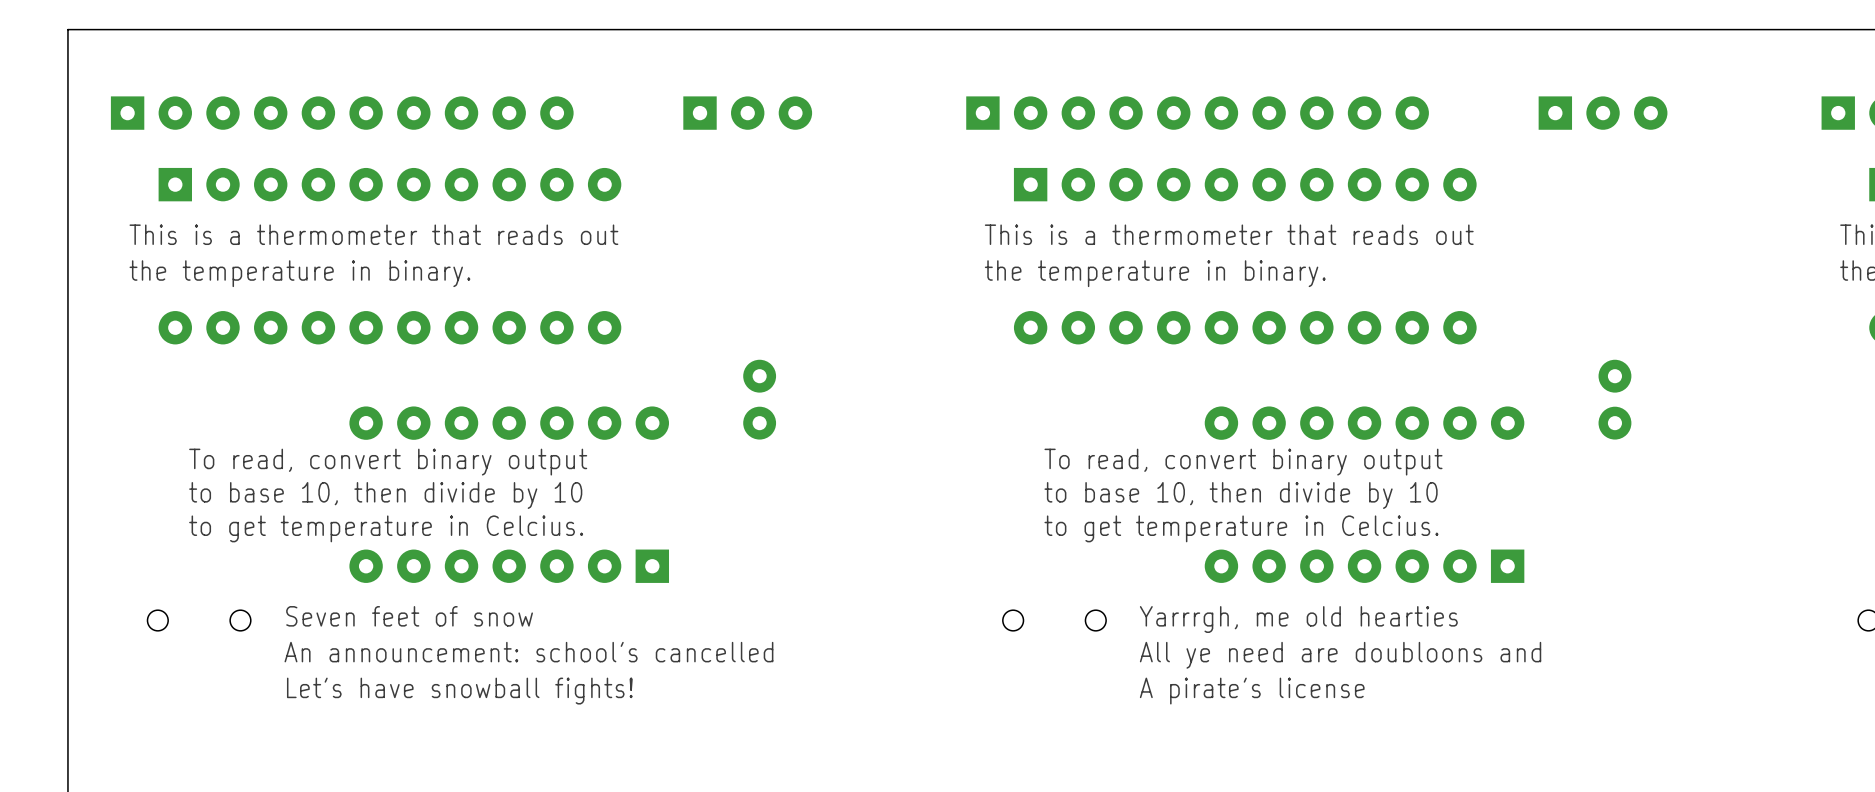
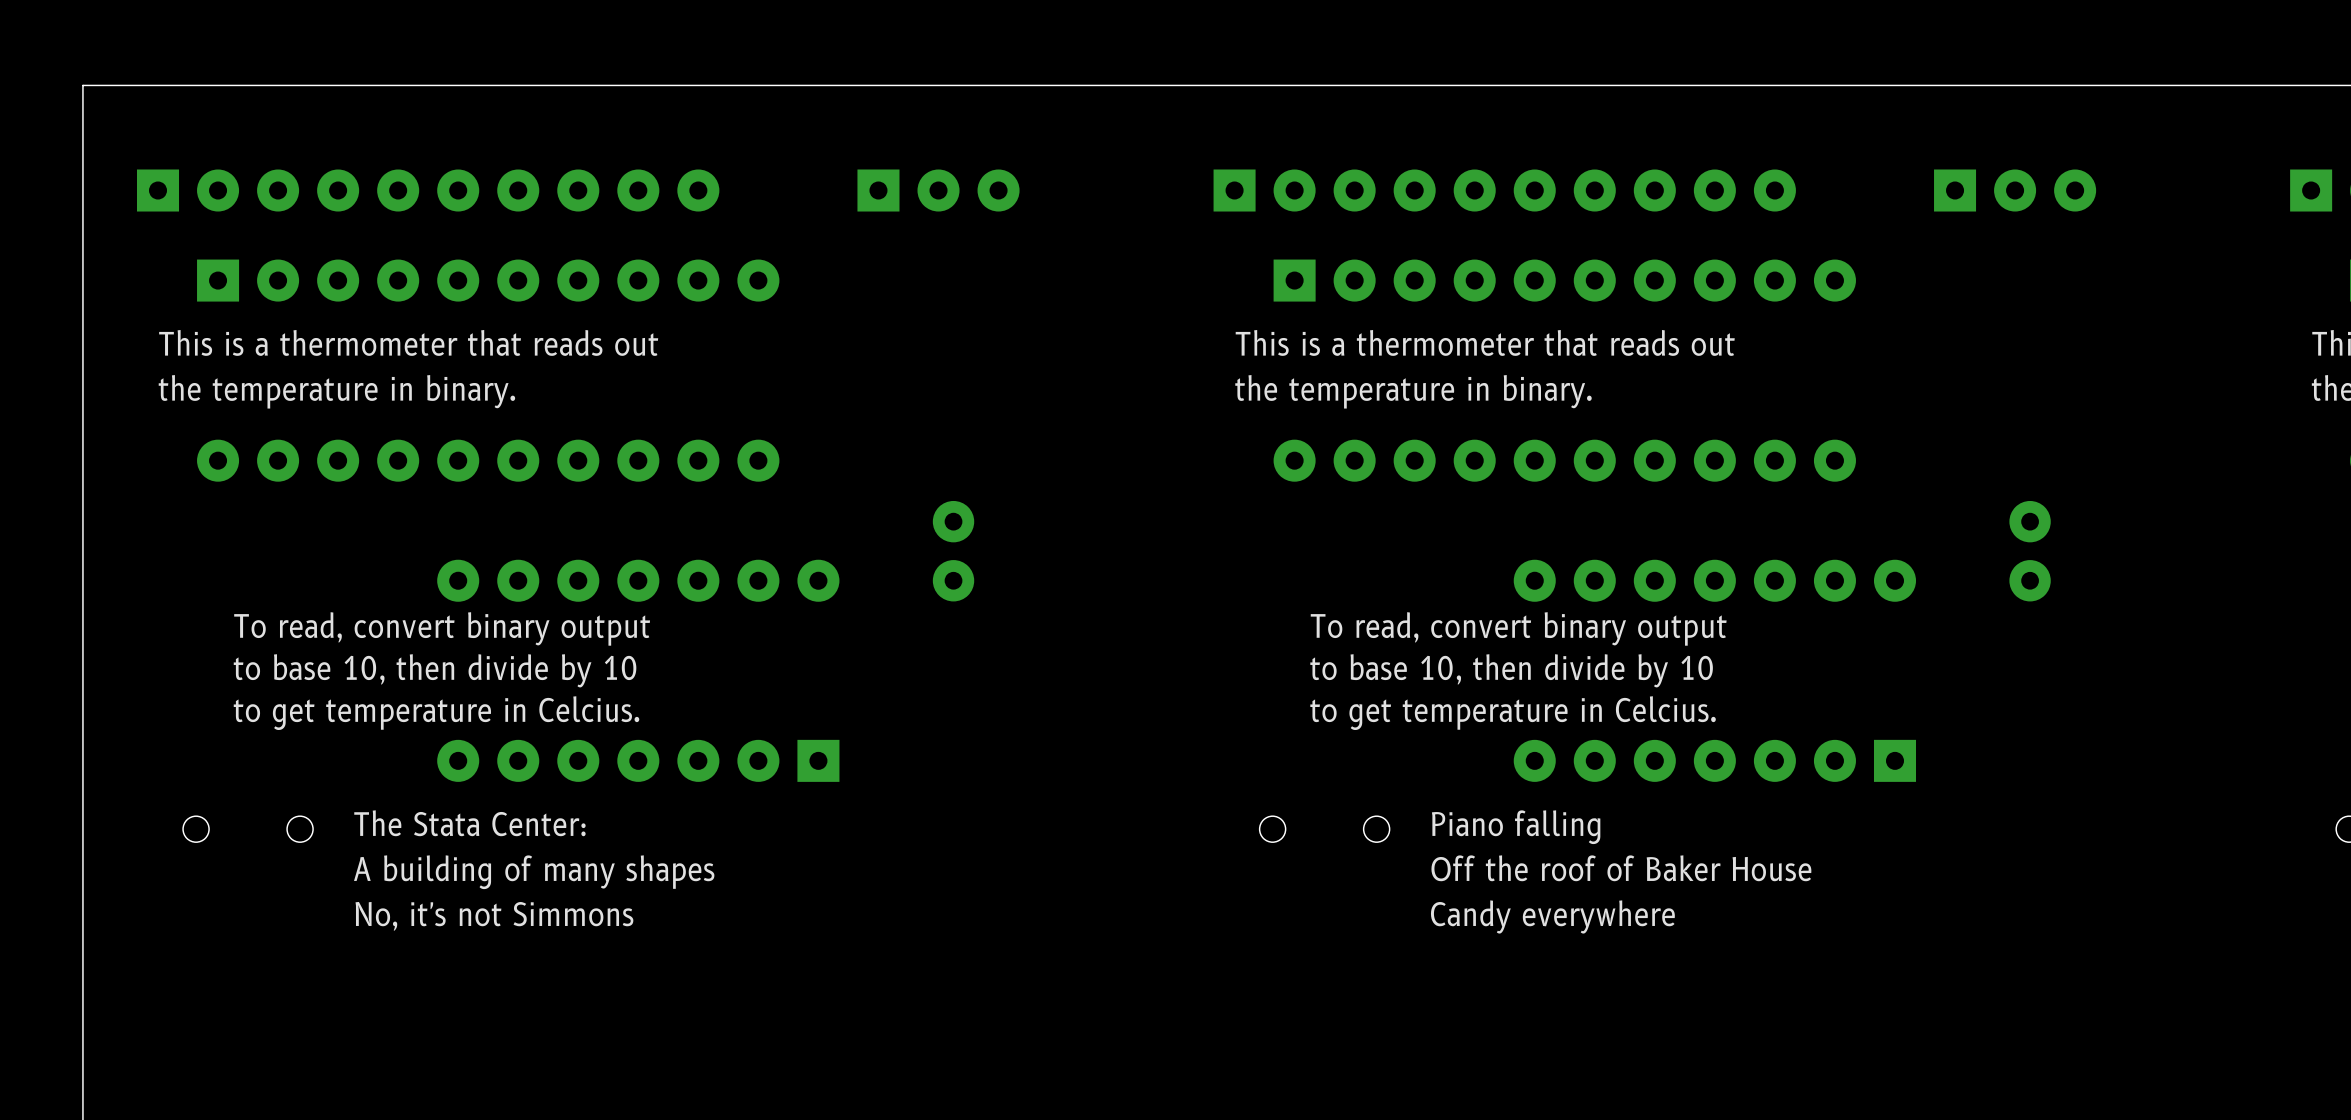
text: Seven feet of snow (409, 616) -> The Stata Center: (469, 823)
text: Yarrrgh, me old hearties (1298, 619) -> Piano falling (1516, 827)
text: An announcement: school's cancelled (528, 652) -> A building of many shapes (534, 872)
text: All ye need are doubloons and (1340, 655) -> Off the roof of Baker House (1621, 868)
text: Let's have snowball fights! (459, 691) -> No, it's not Simmons (494, 916)
text: A pirate's license (1252, 691) -> Candy everywhere (1552, 916)

